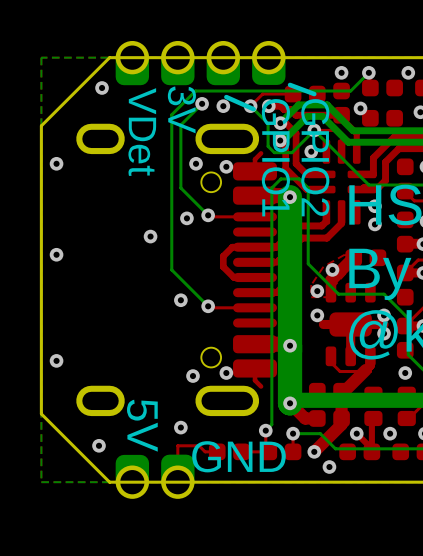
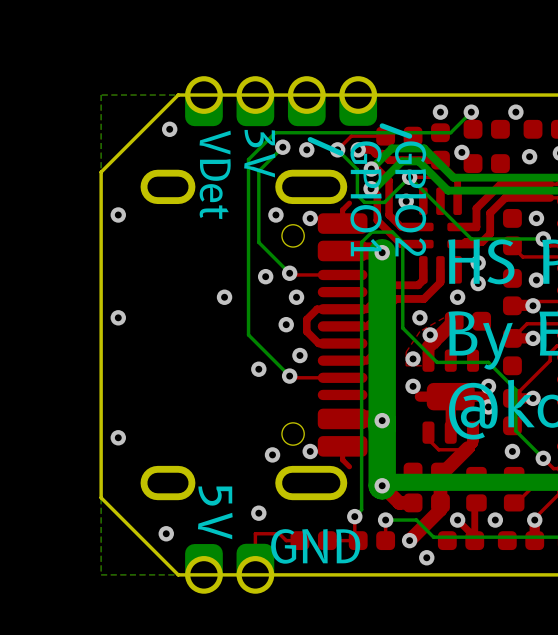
via: none -> (296, 297)
via: none -> (457, 297)
via: none -> (419, 317)
via: none -> (286, 324)
via: none -> (299, 355)

